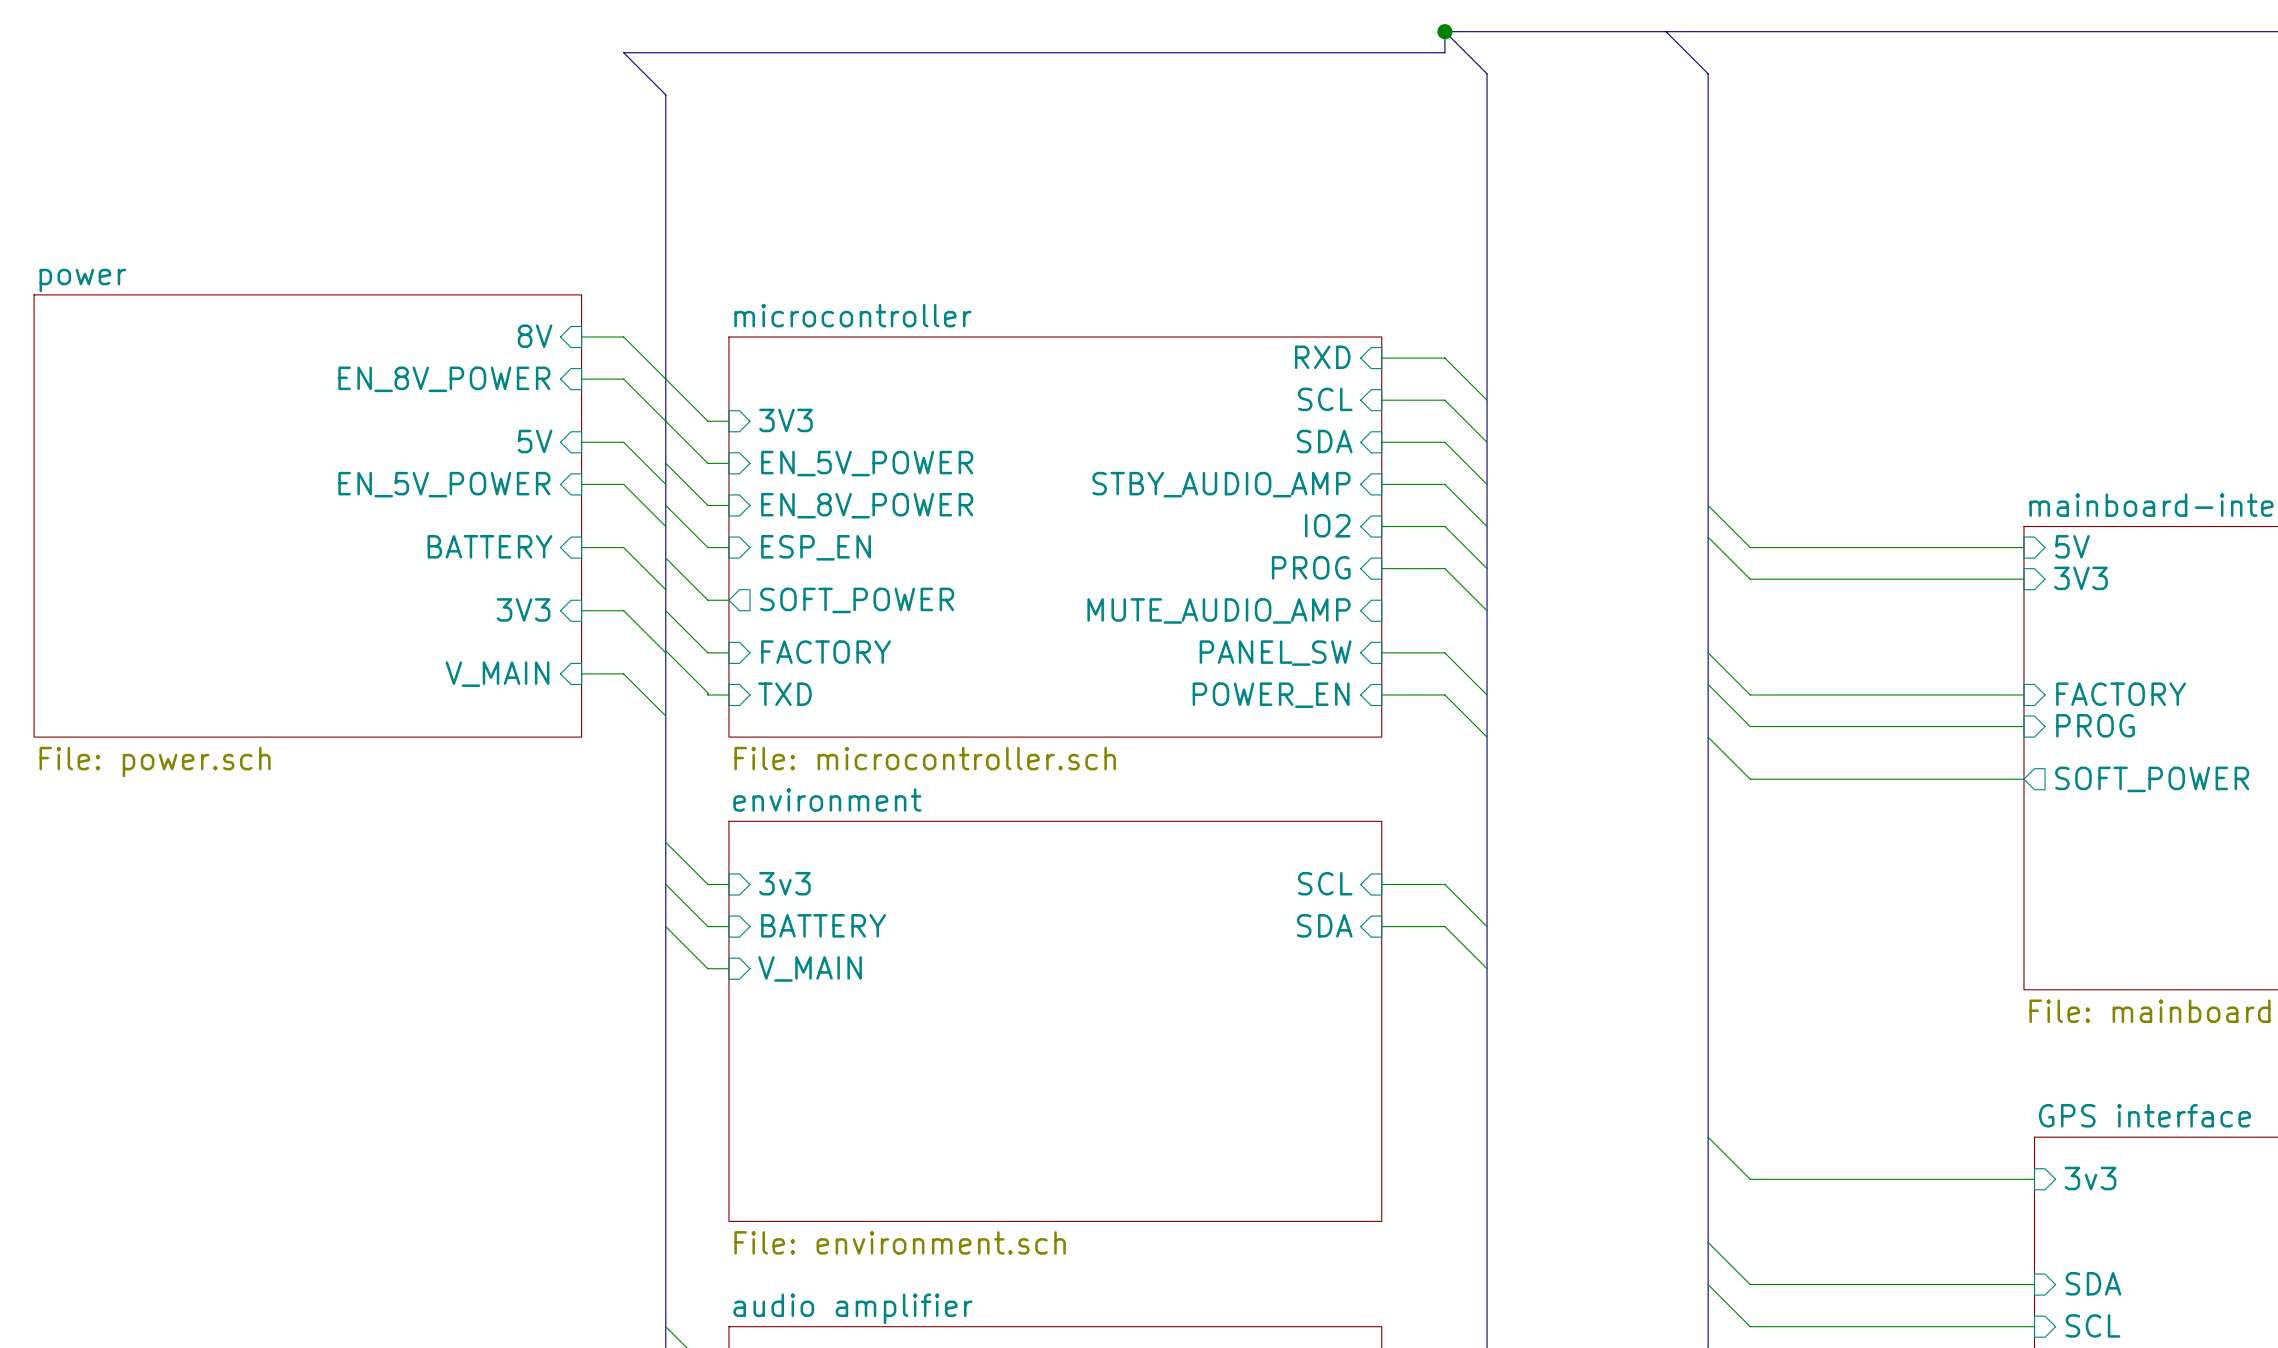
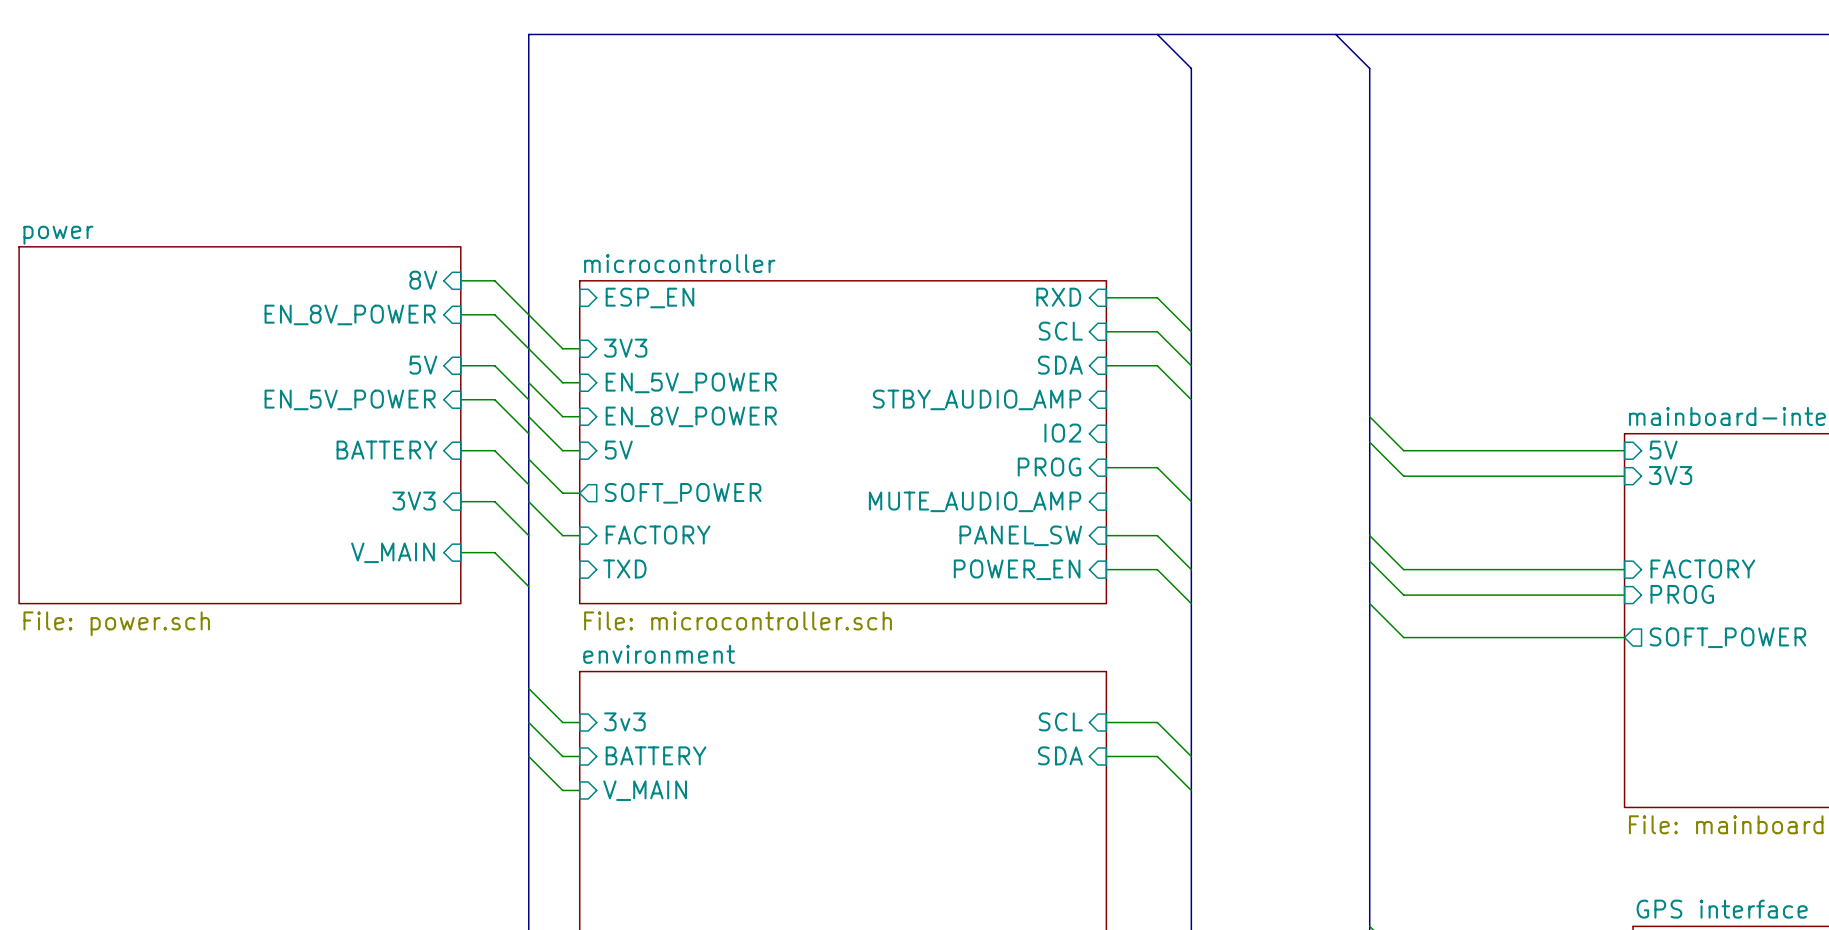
bus: (1444, 29) (1444, 52) (623, 52) (665, 94) -> (1157, 34) (528, 34) (528, 85)
junction: (1444, 31) -> none
sheet pin: none -> ESP_EN (649, 297)
wire: (1381, 484) (1444, 484) (1487, 526) -> none
wire: (1381, 526) (1444, 526) (1487, 568) -> none
sheet pin: ESP_EN (816, 547) -> 5V (618, 450)
wire: (665, 650) (707, 694) (728, 694) -> none

